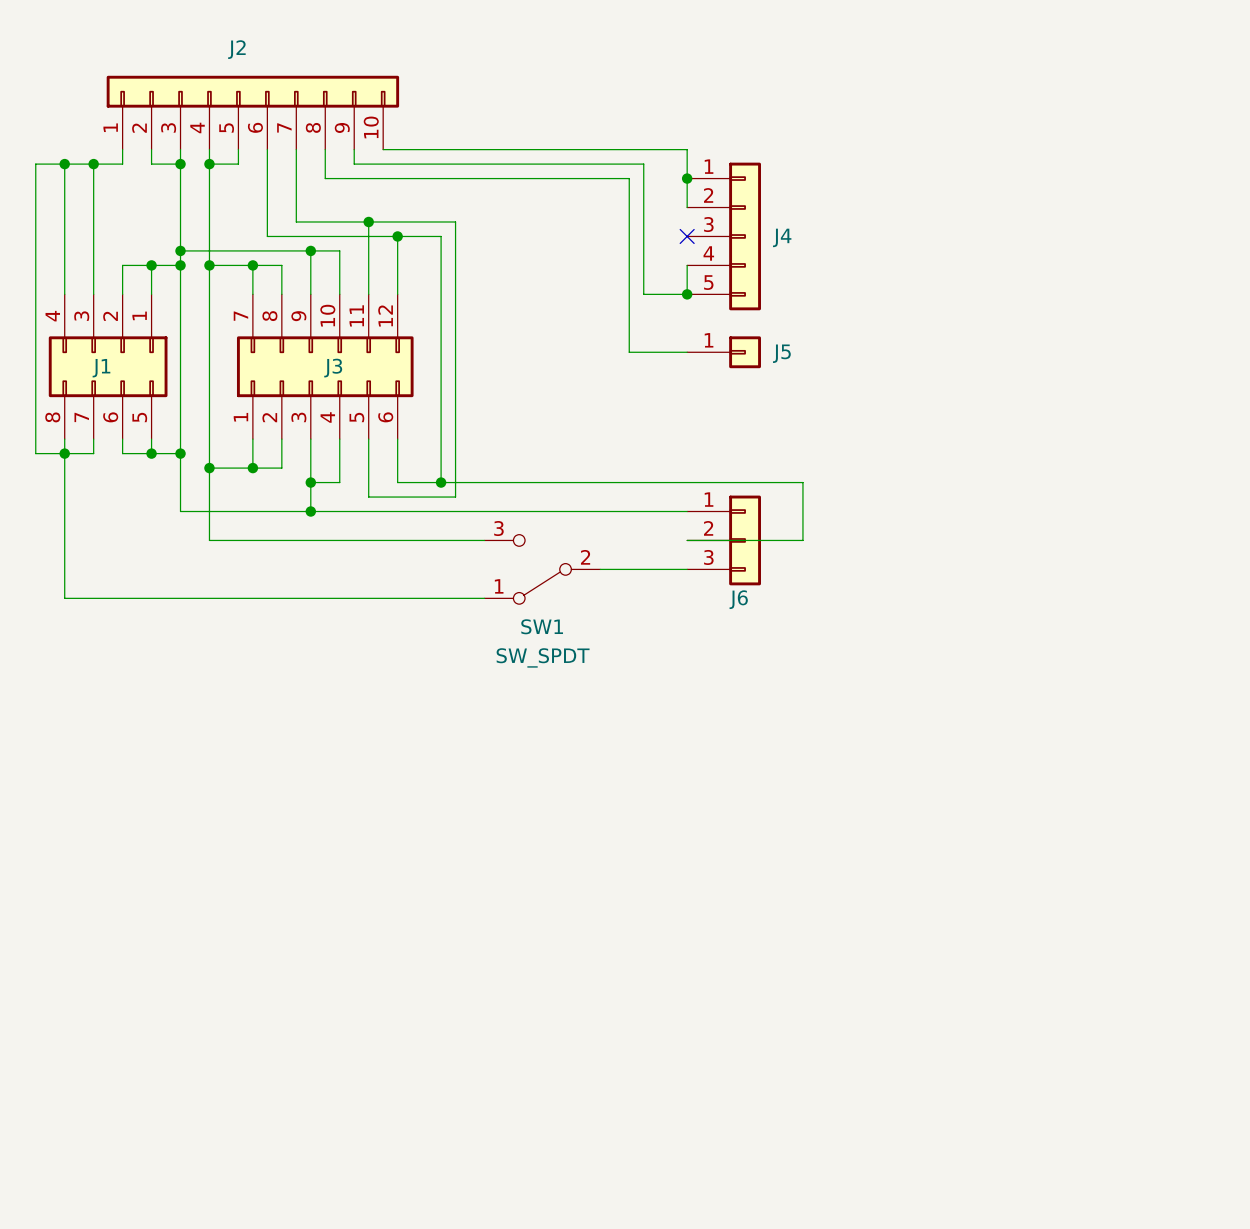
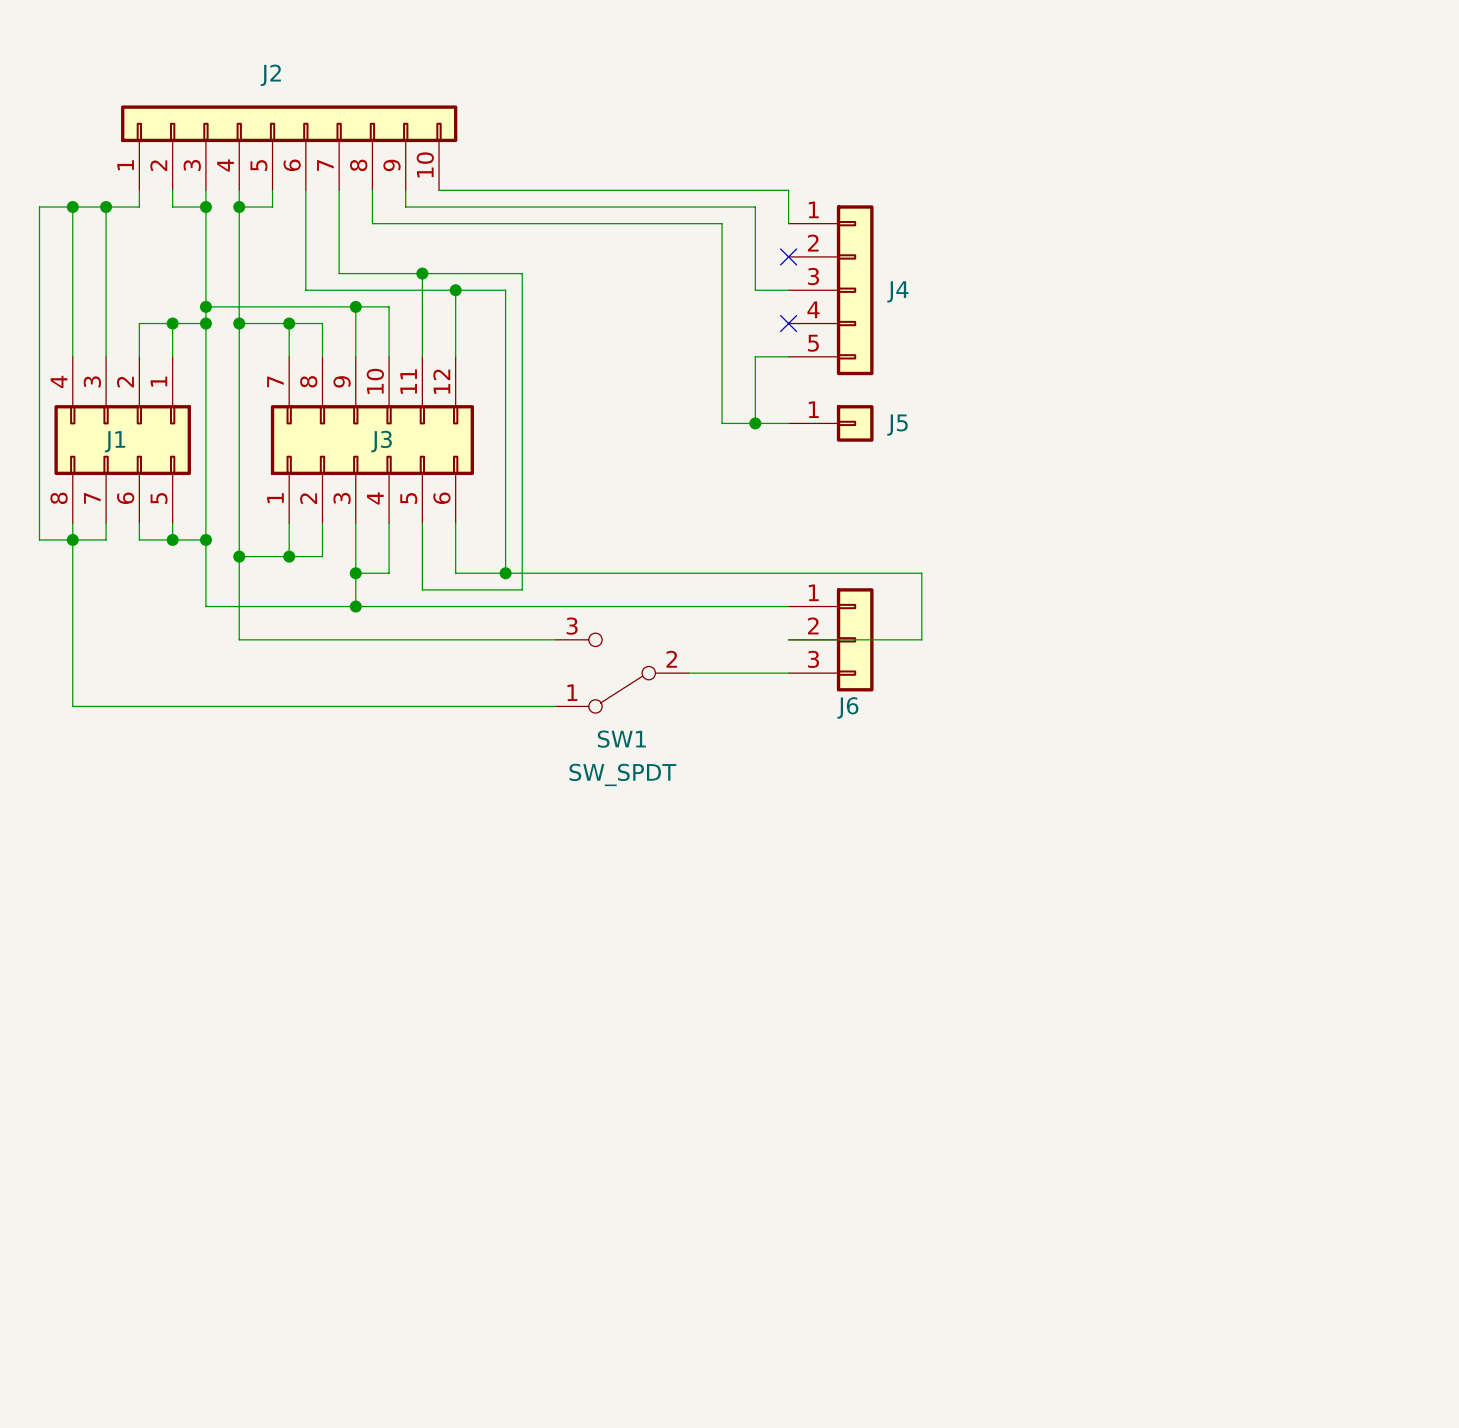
wire: (643, 164) (643, 294) (658, 294) -> (738, 207) (755, 207) (755, 290) (788, 290)
wire: (687, 178) (687, 207) -> none
junction: (687, 178) -> none
no-connect mark: none -> (788, 256)
no-connect mark: (687, 236) -> none
wire: (687, 265) (687, 294) -> none
no-connect mark: none -> (788, 323)
wire: none -> (755, 356) (755, 423)
junction position: (687, 294) -> (755, 423)

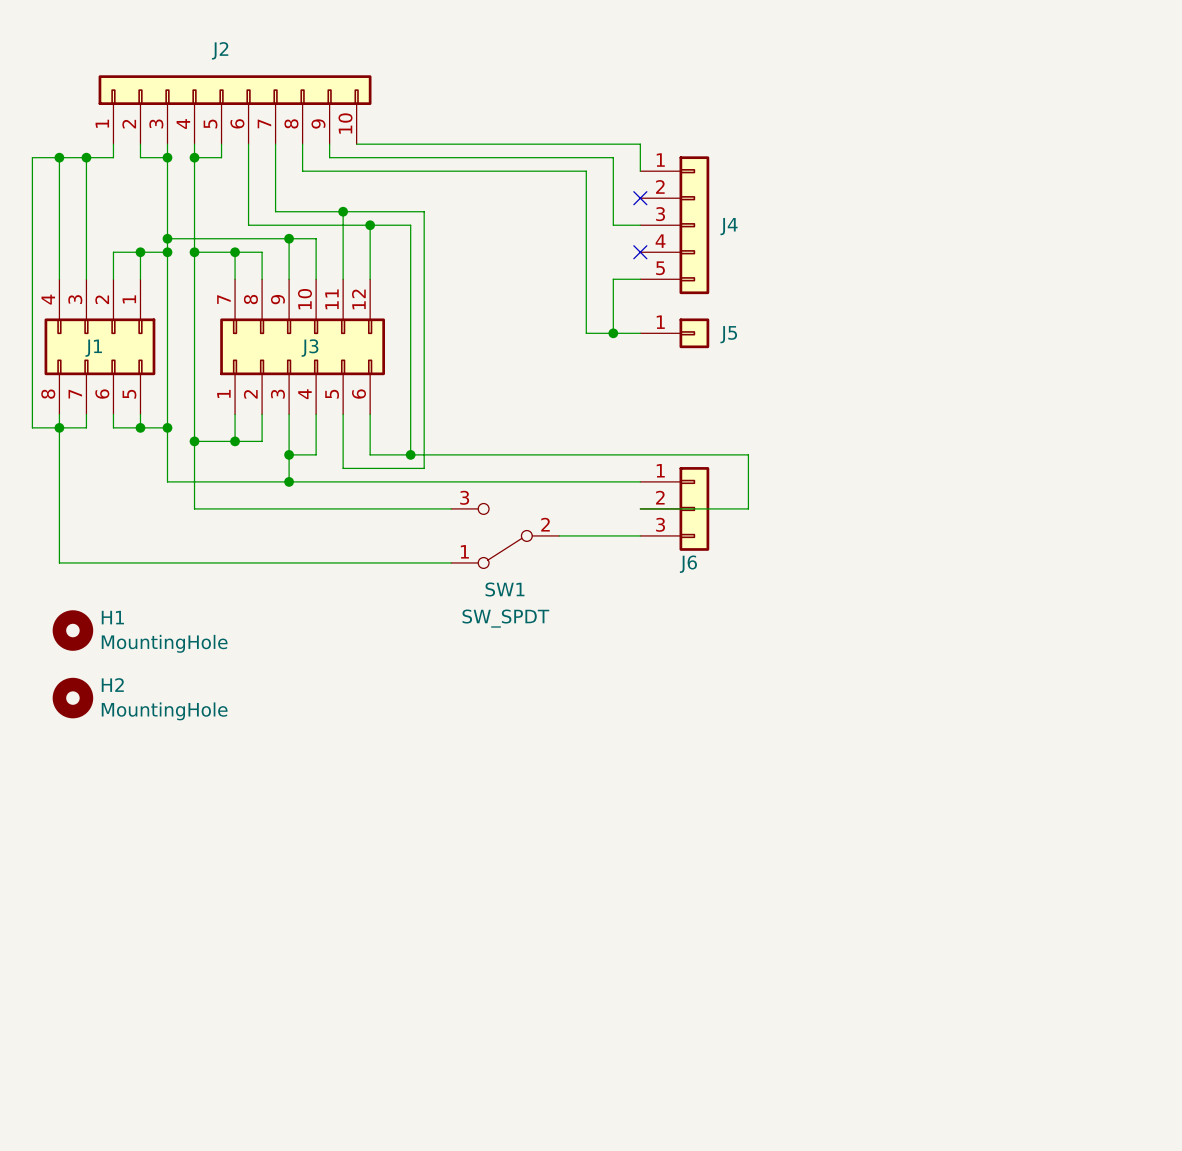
H1: none -> MountingHole (72, 630)
H2: none -> MountingHole (72, 698)

